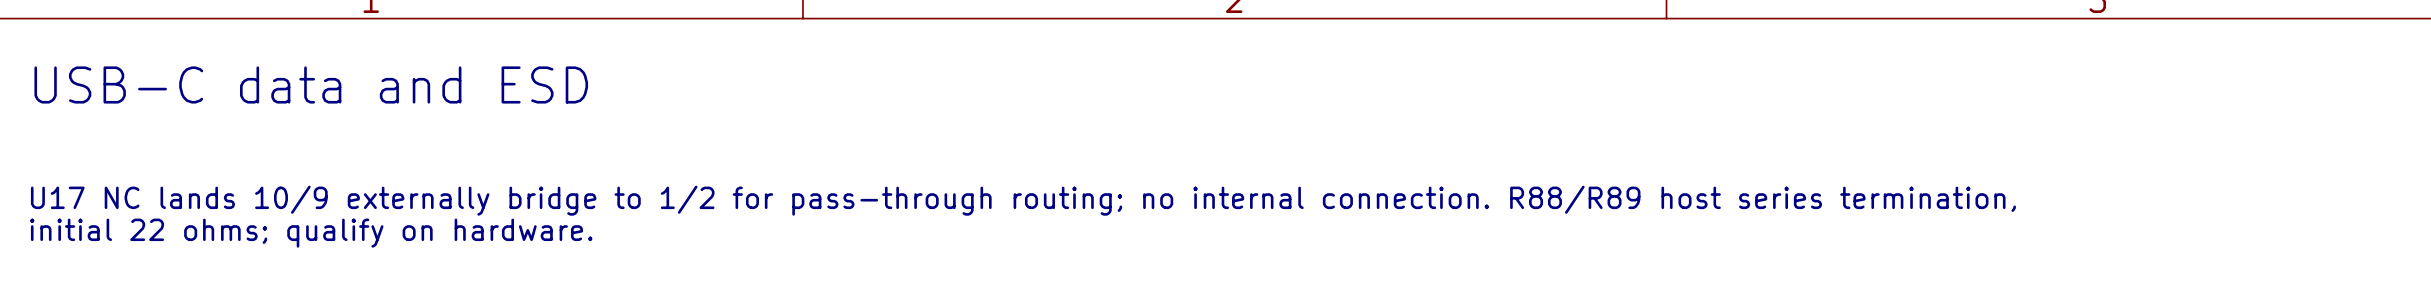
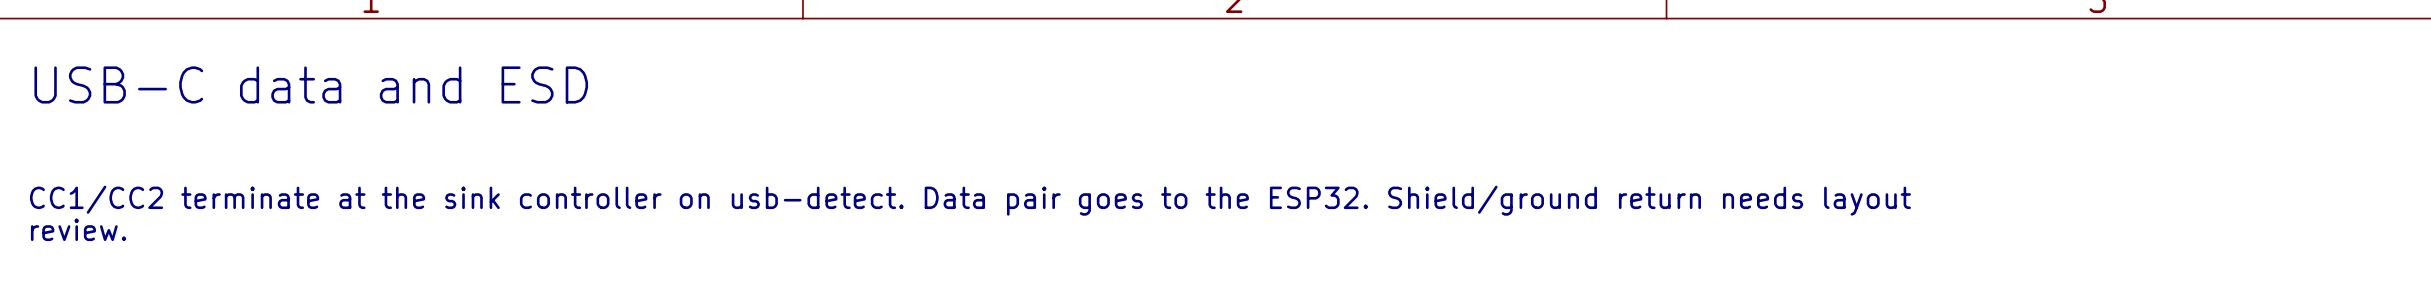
text: U17 NC lands 10/9 externally bridge to 1/2 for pass-through routing; no internal connection. R88/R89 host series termination, (1023, 200) -> CC1/CC2 terminate at the sink controller on usb-detect. Data pair goes to the ESP32. Shield/ground return needs layout (970, 200)
text: initial 22 ohms; qualify on hardware. (311, 233) -> review. (78, 229)

